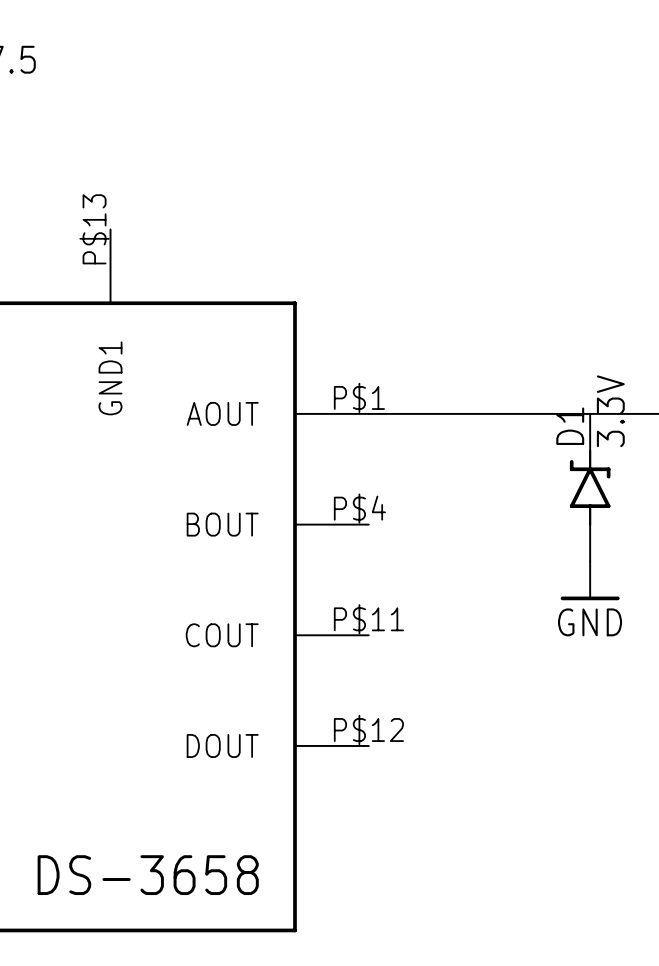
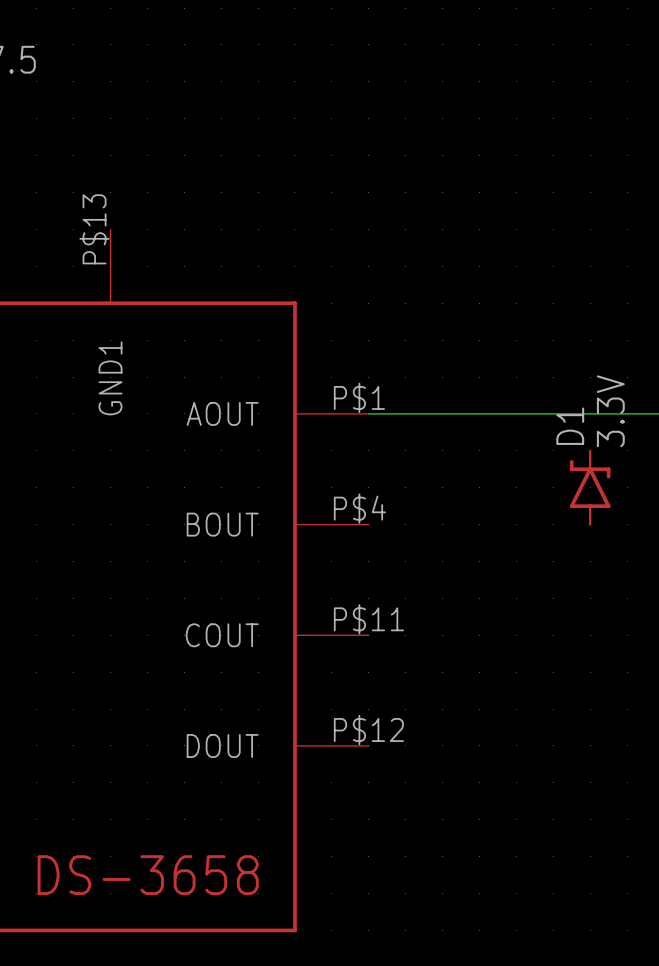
wire: (590, 413) (590, 450) -> none
wire: (590, 524) (590, 561) -> none
power symbol: GND (590, 580) -> none

